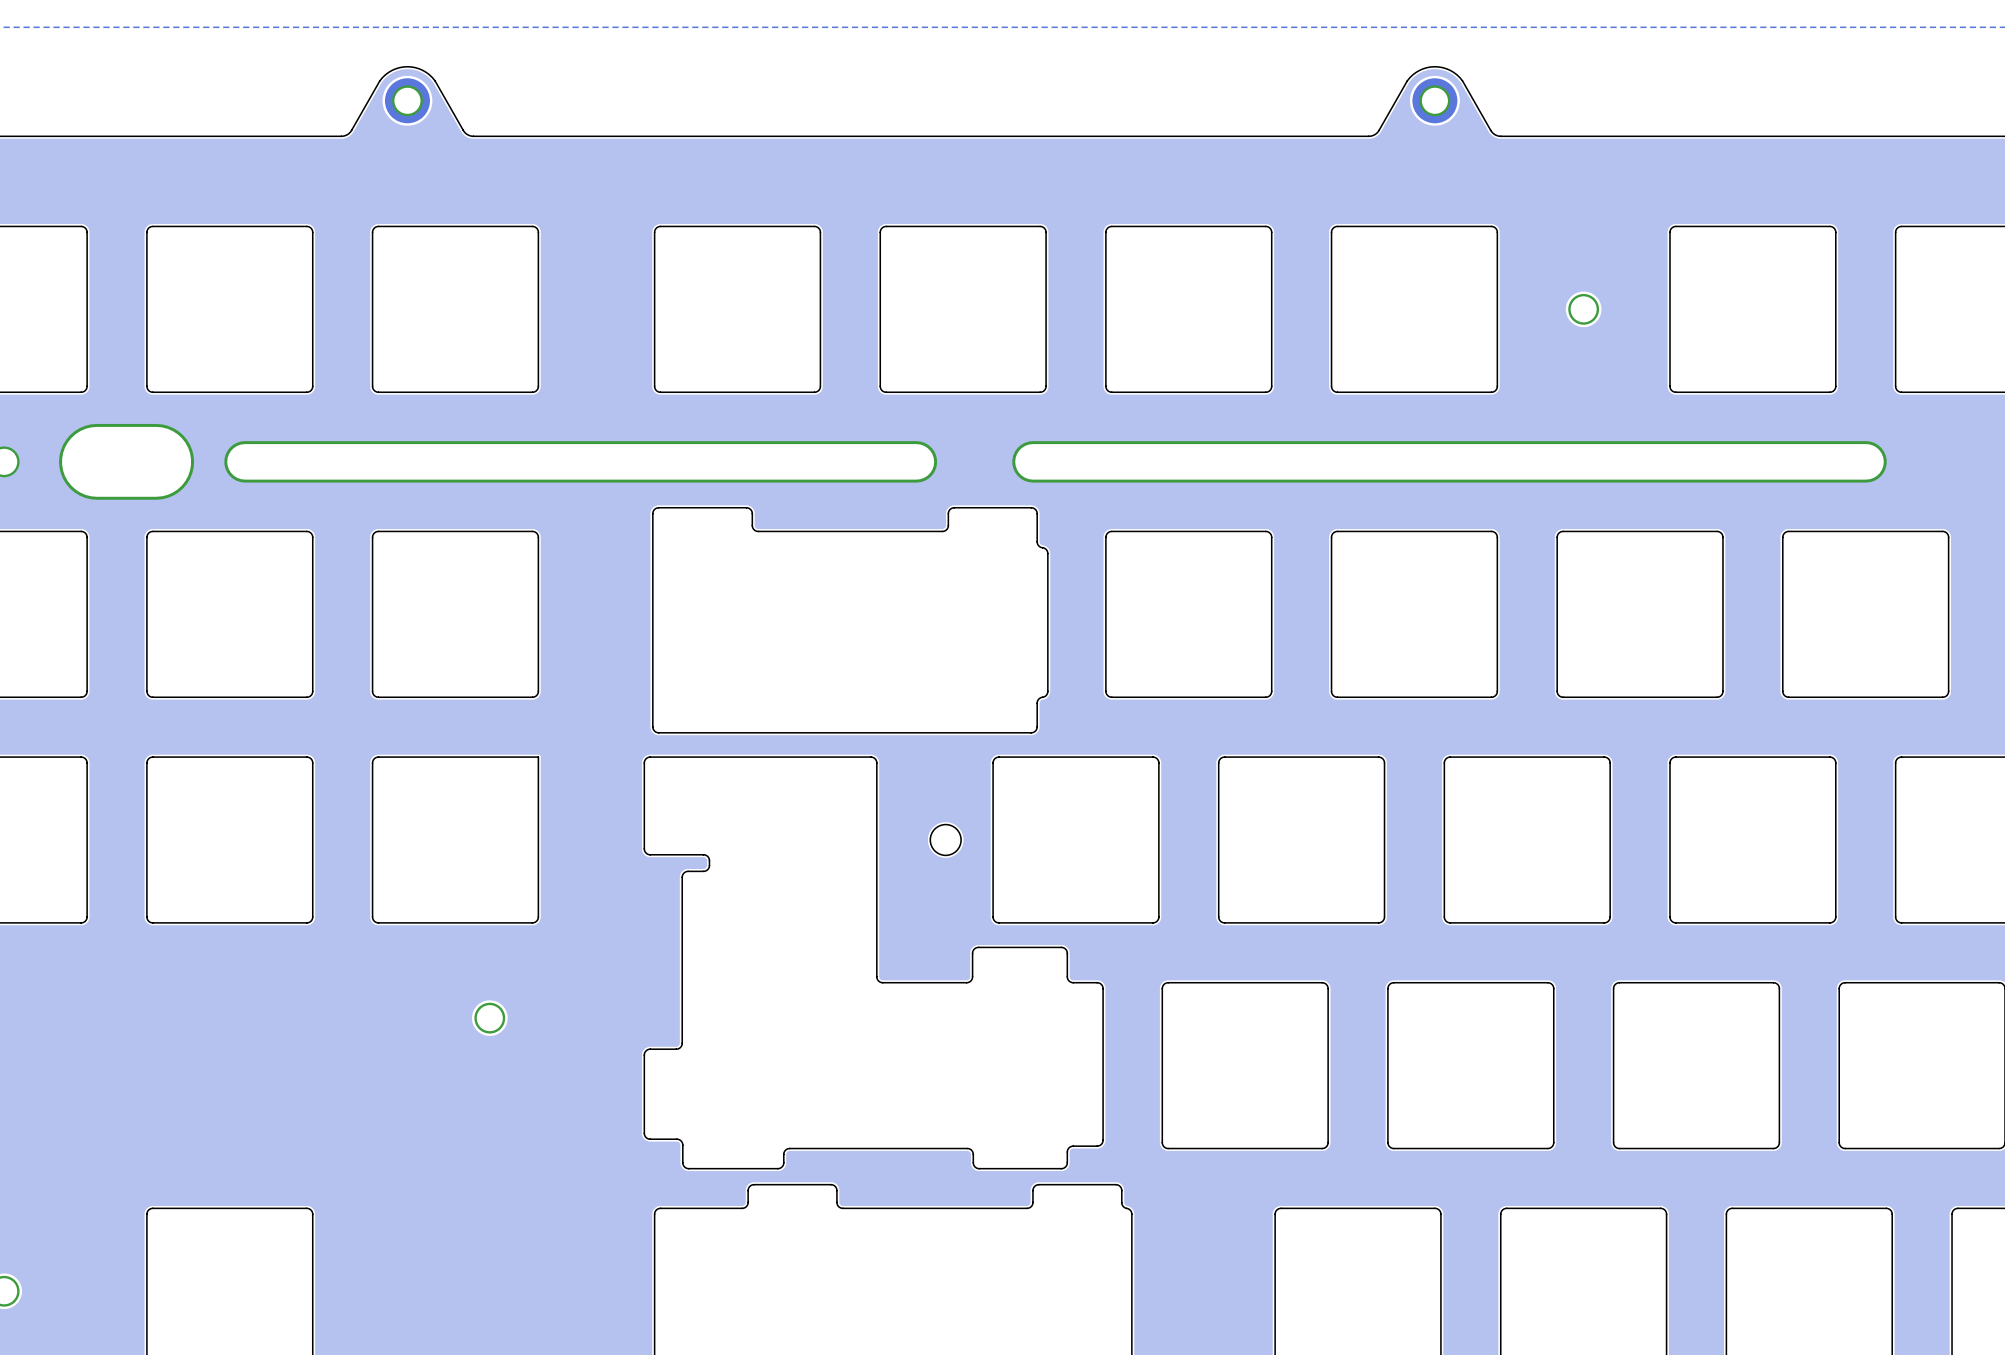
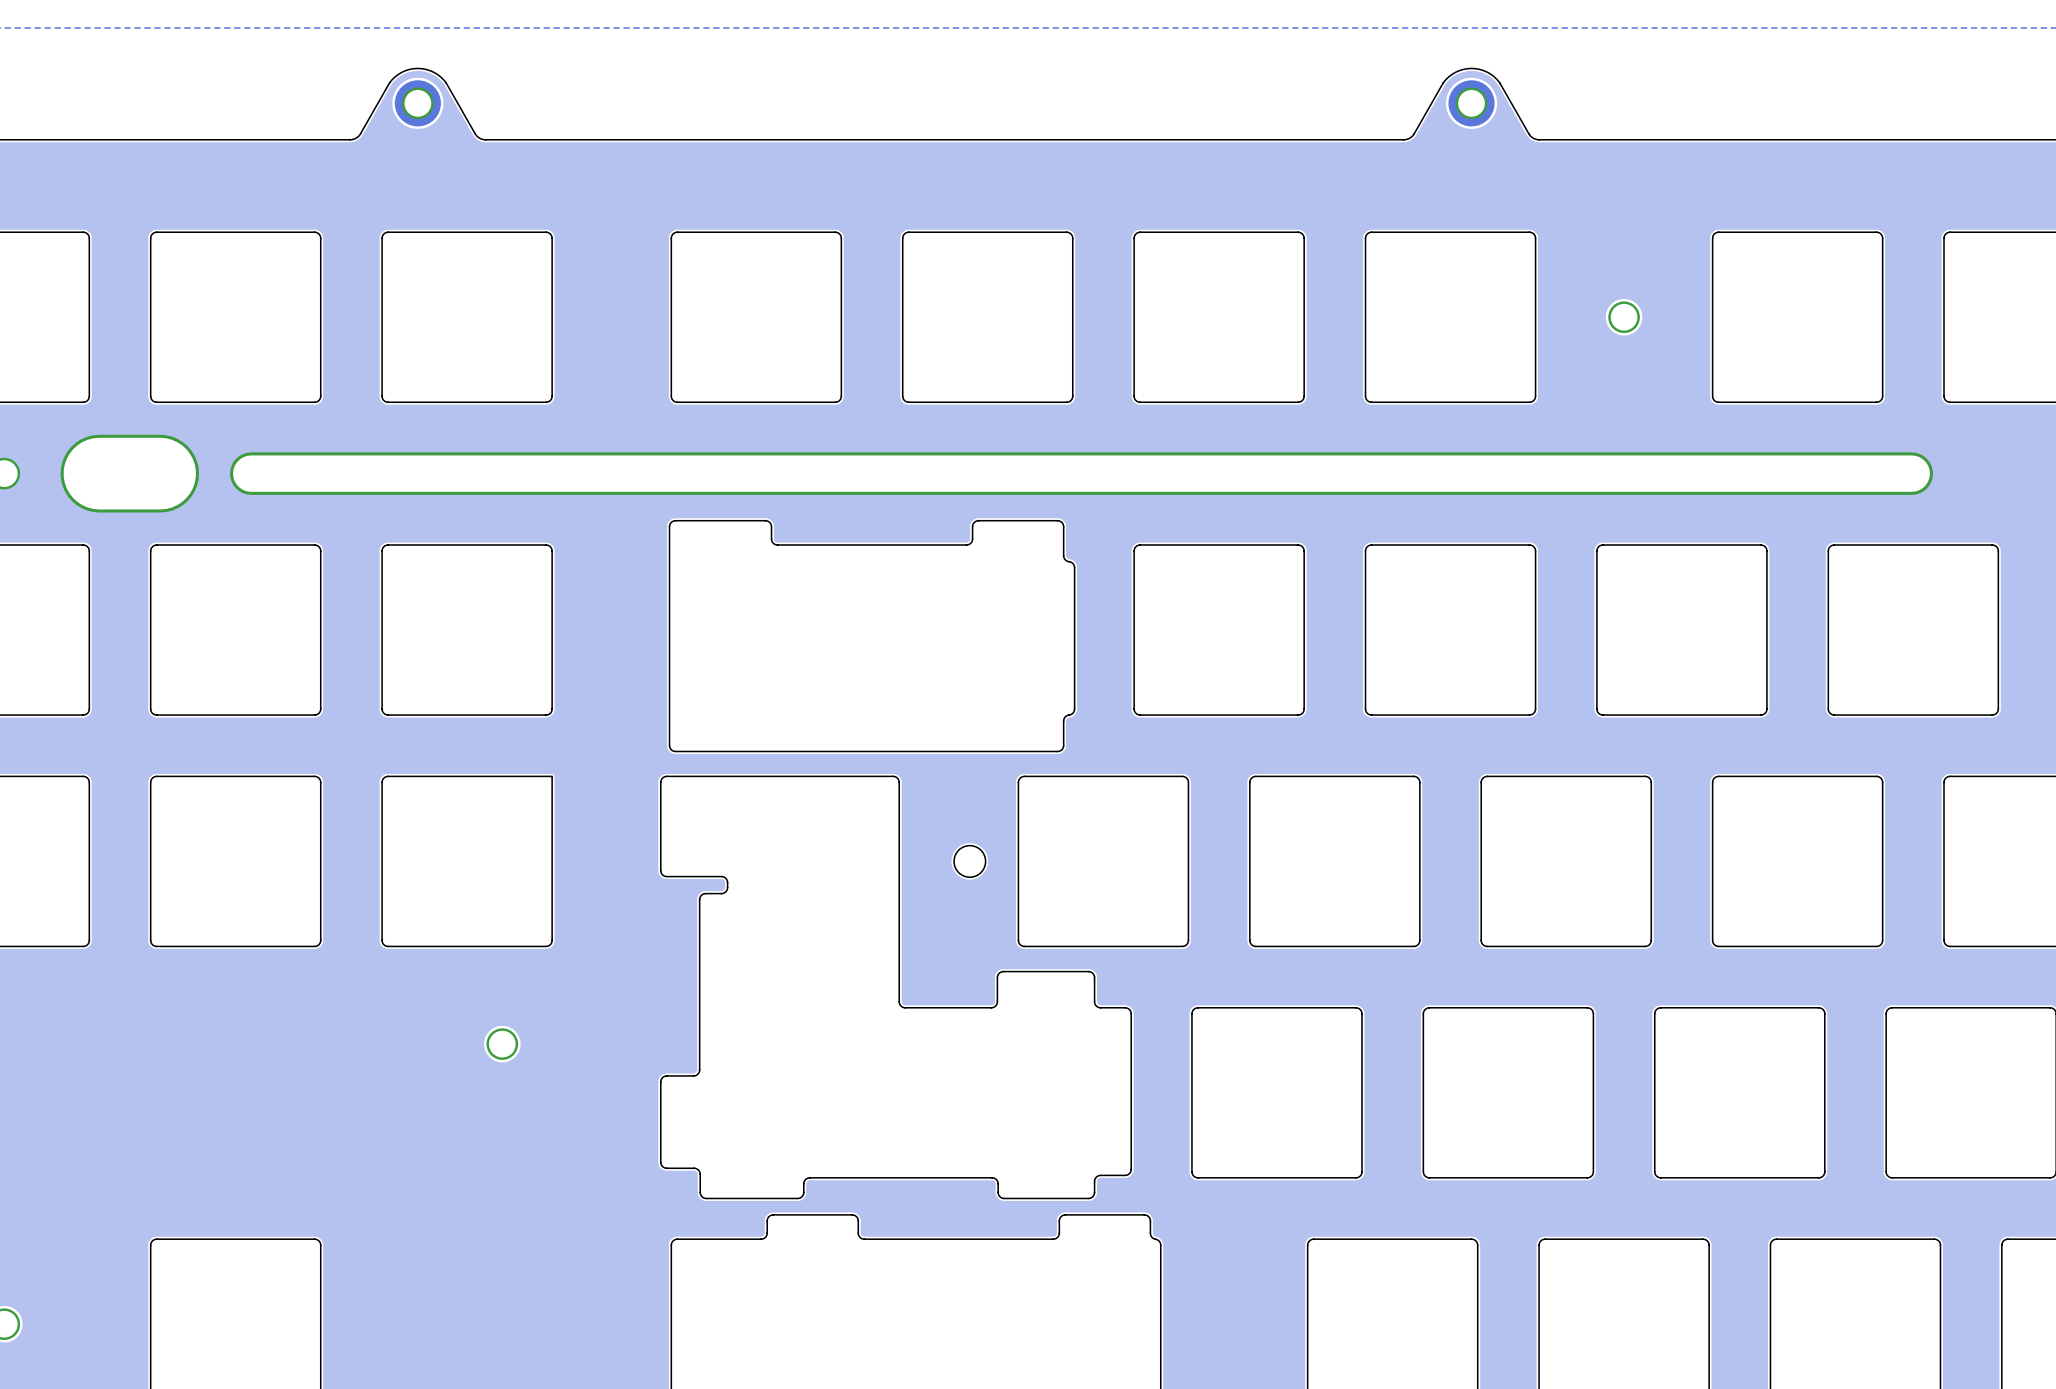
part: (580, 461) -> none
part: none -> (1081, 473)
part: (1449, 461) -> none

